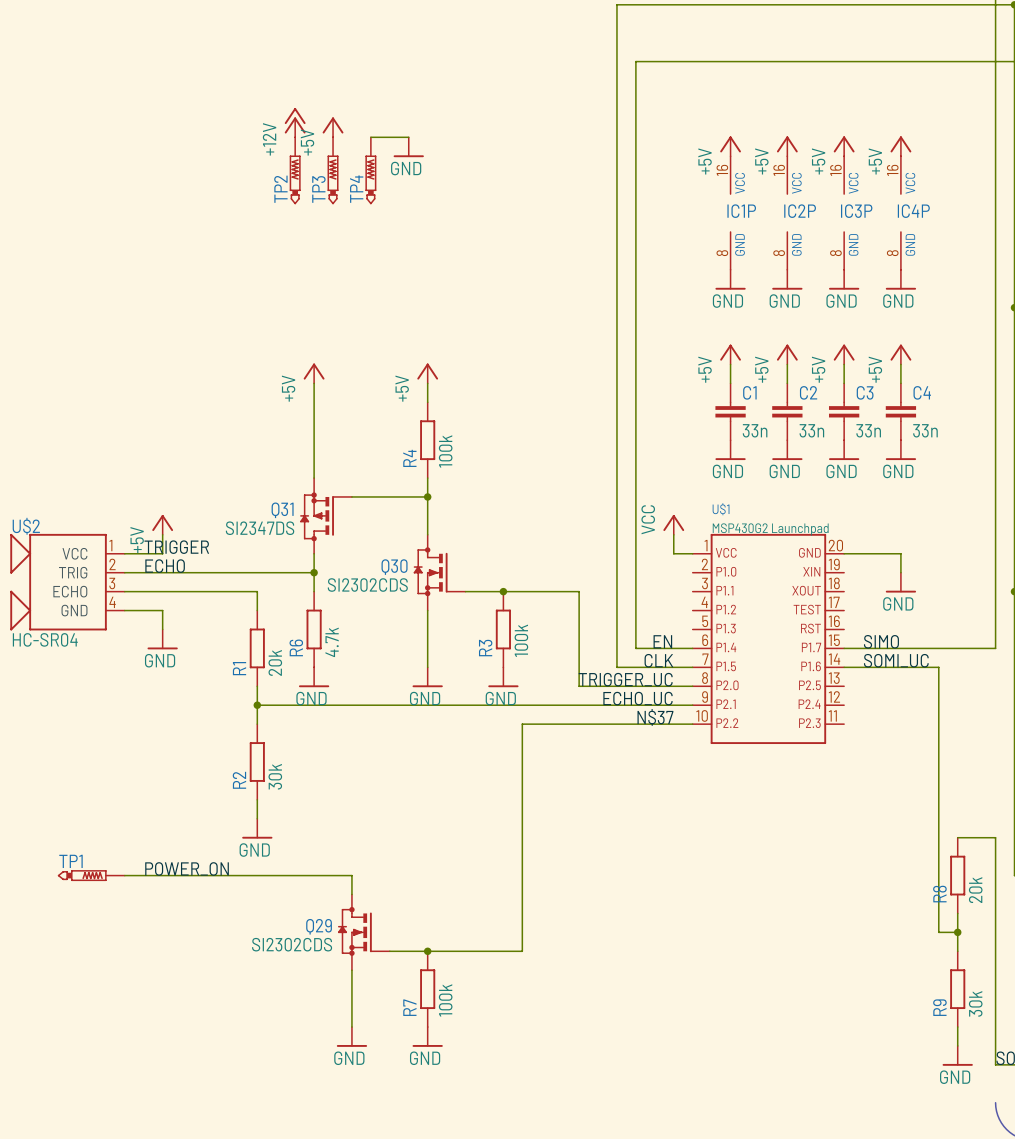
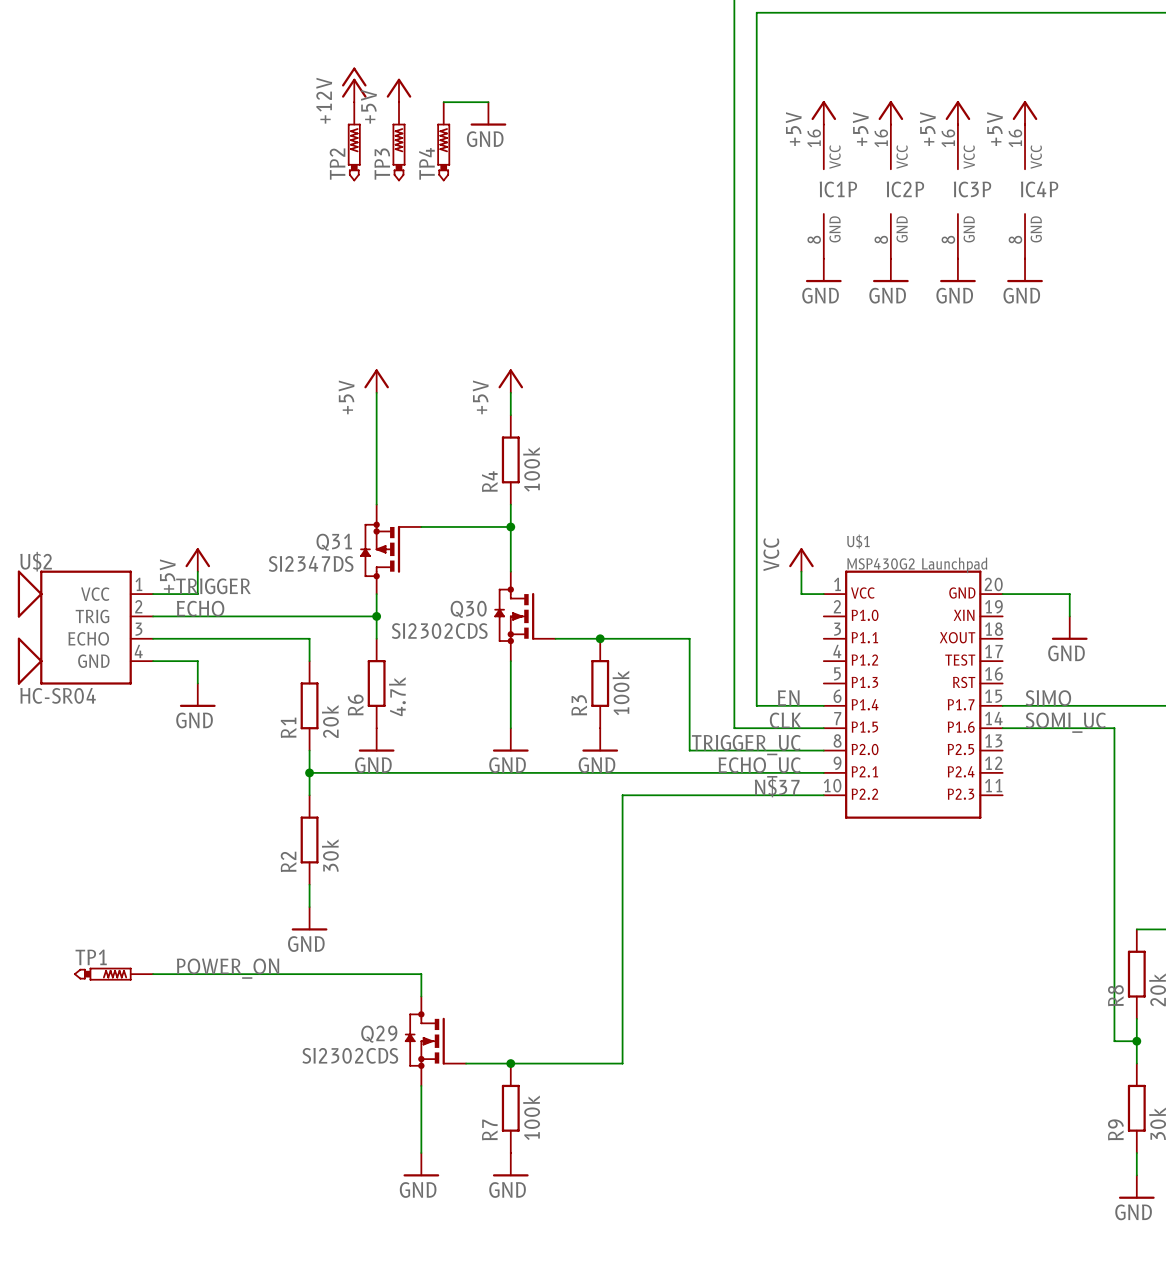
power symbol: none -> +5V (823, 112)
power symbol: +5V (730, 146) -> none
power symbol: none -> +5V (890, 112)
power symbol: +5V (787, 146) -> none
power symbol: none -> +5V (957, 112)
power symbol: +5V (844, 146) -> none
power symbol: none -> +5V (1025, 112)
power symbol: +5V (900, 146) -> none
IC1P position: (730, 213) -> (823, 191)
IC2P position: (787, 213) -> (890, 191)
IC3P position: (844, 213) -> (957, 191)
IC4P position: (900, 213) -> (1025, 191)
power symbol: none -> GND (823, 270)
power symbol: GND (730, 279) -> none
power symbol: none -> GND (890, 270)
power symbol: GND (787, 279) -> none
power symbol: none -> GND (957, 270)
power symbol: GND (844, 279) -> none
power symbol: none -> GND (1025, 270)
power symbol: GND (900, 279) -> none
power symbol: +5V (730, 354) -> none
power symbol: +5V (787, 354) -> none
power symbol: +5V (844, 354) -> none
power symbol: +5V (900, 354) -> none
wire: (730, 364) (730, 383) -> none
wire: (787, 364) (787, 383) -> none
wire: (844, 364) (844, 383) -> none
wire: (900, 364) (900, 383) -> none
C1: 33n (730, 411) -> none
C2: 33n (787, 411) -> none
C3: 33n (844, 411) -> none
C4: 33n (900, 411) -> none
power symbol: GND (730, 450) -> none
power symbol: GND (787, 450) -> none
power symbol: GND (844, 450) -> none
power symbol: GND (900, 450) -> none

